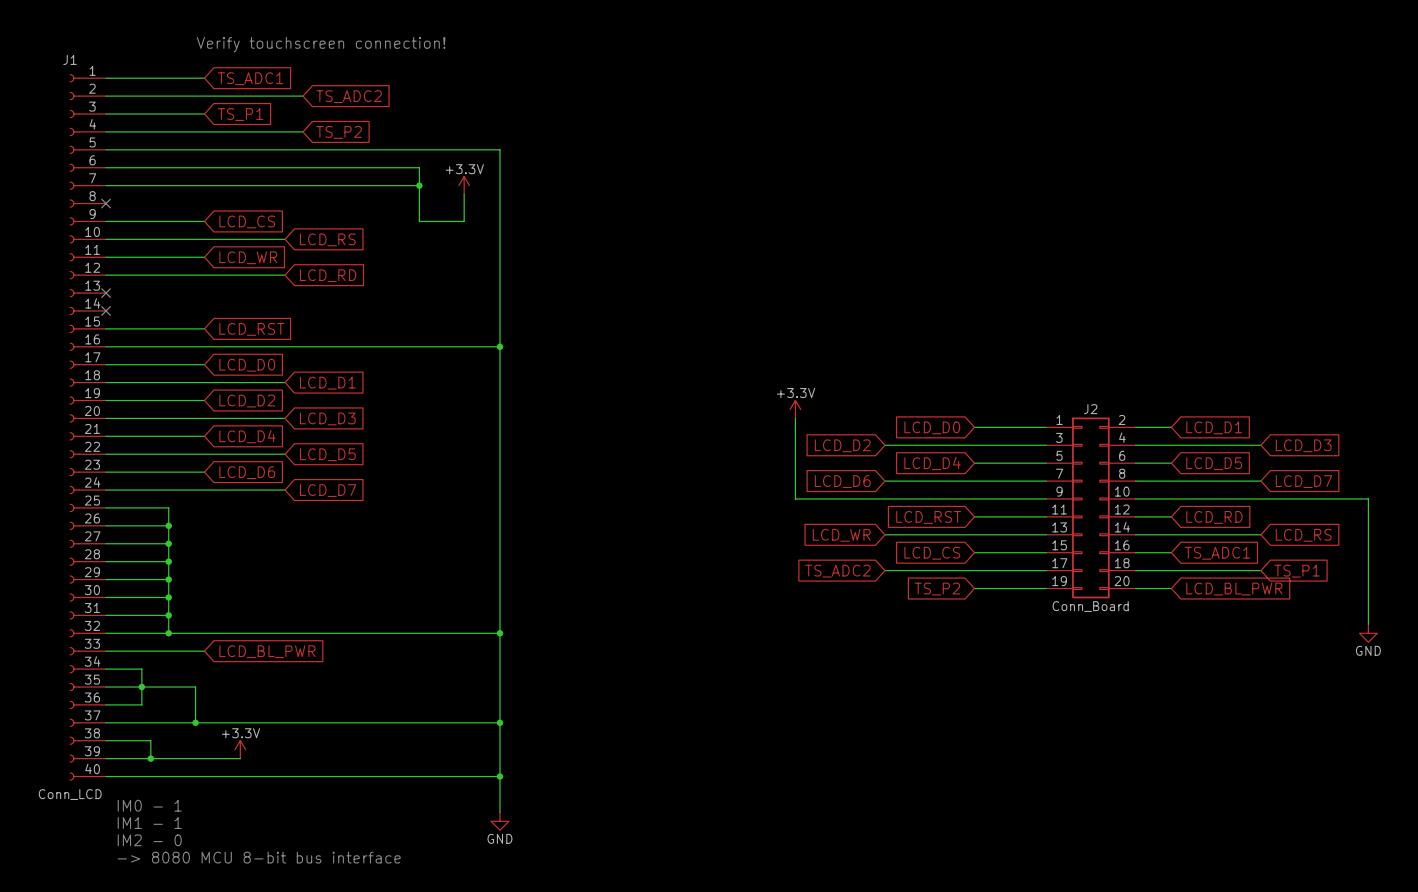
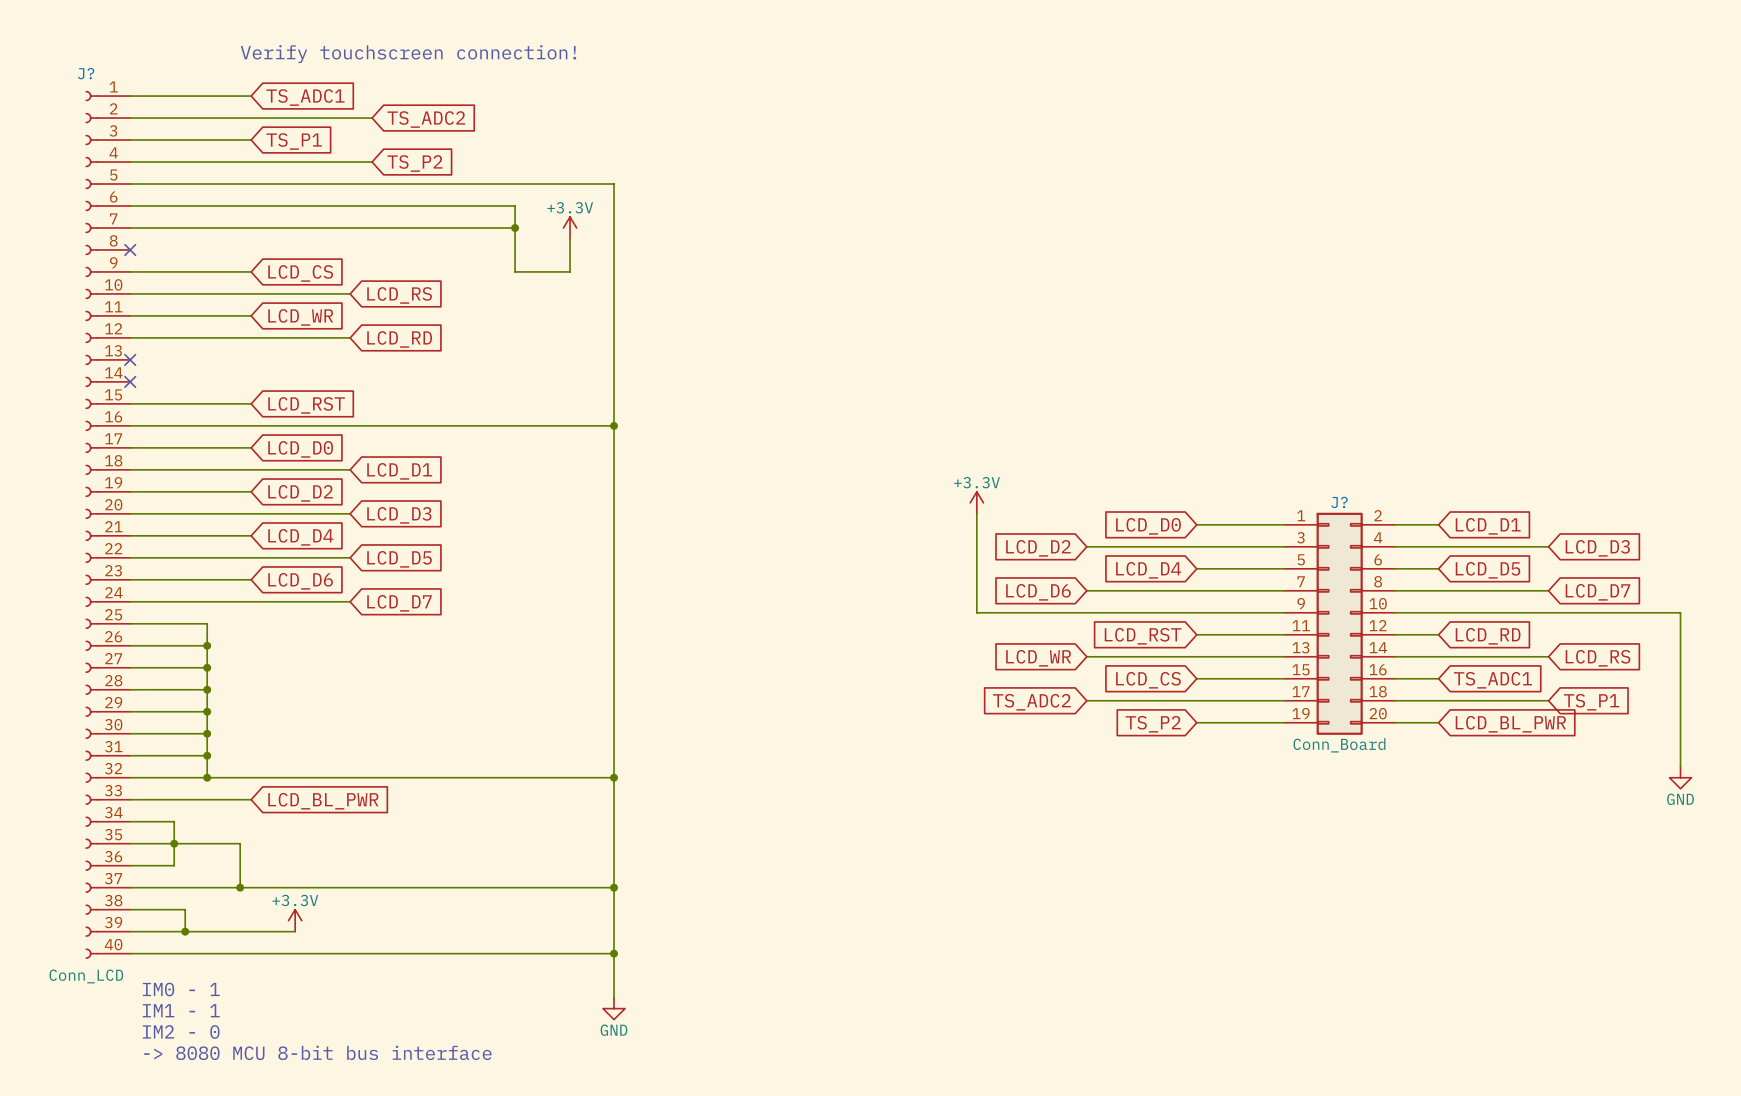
J1 name: J1 (70, 59) -> J? (86, 73)
J2 name: J2 (1090, 409) -> J? (1339, 502)

